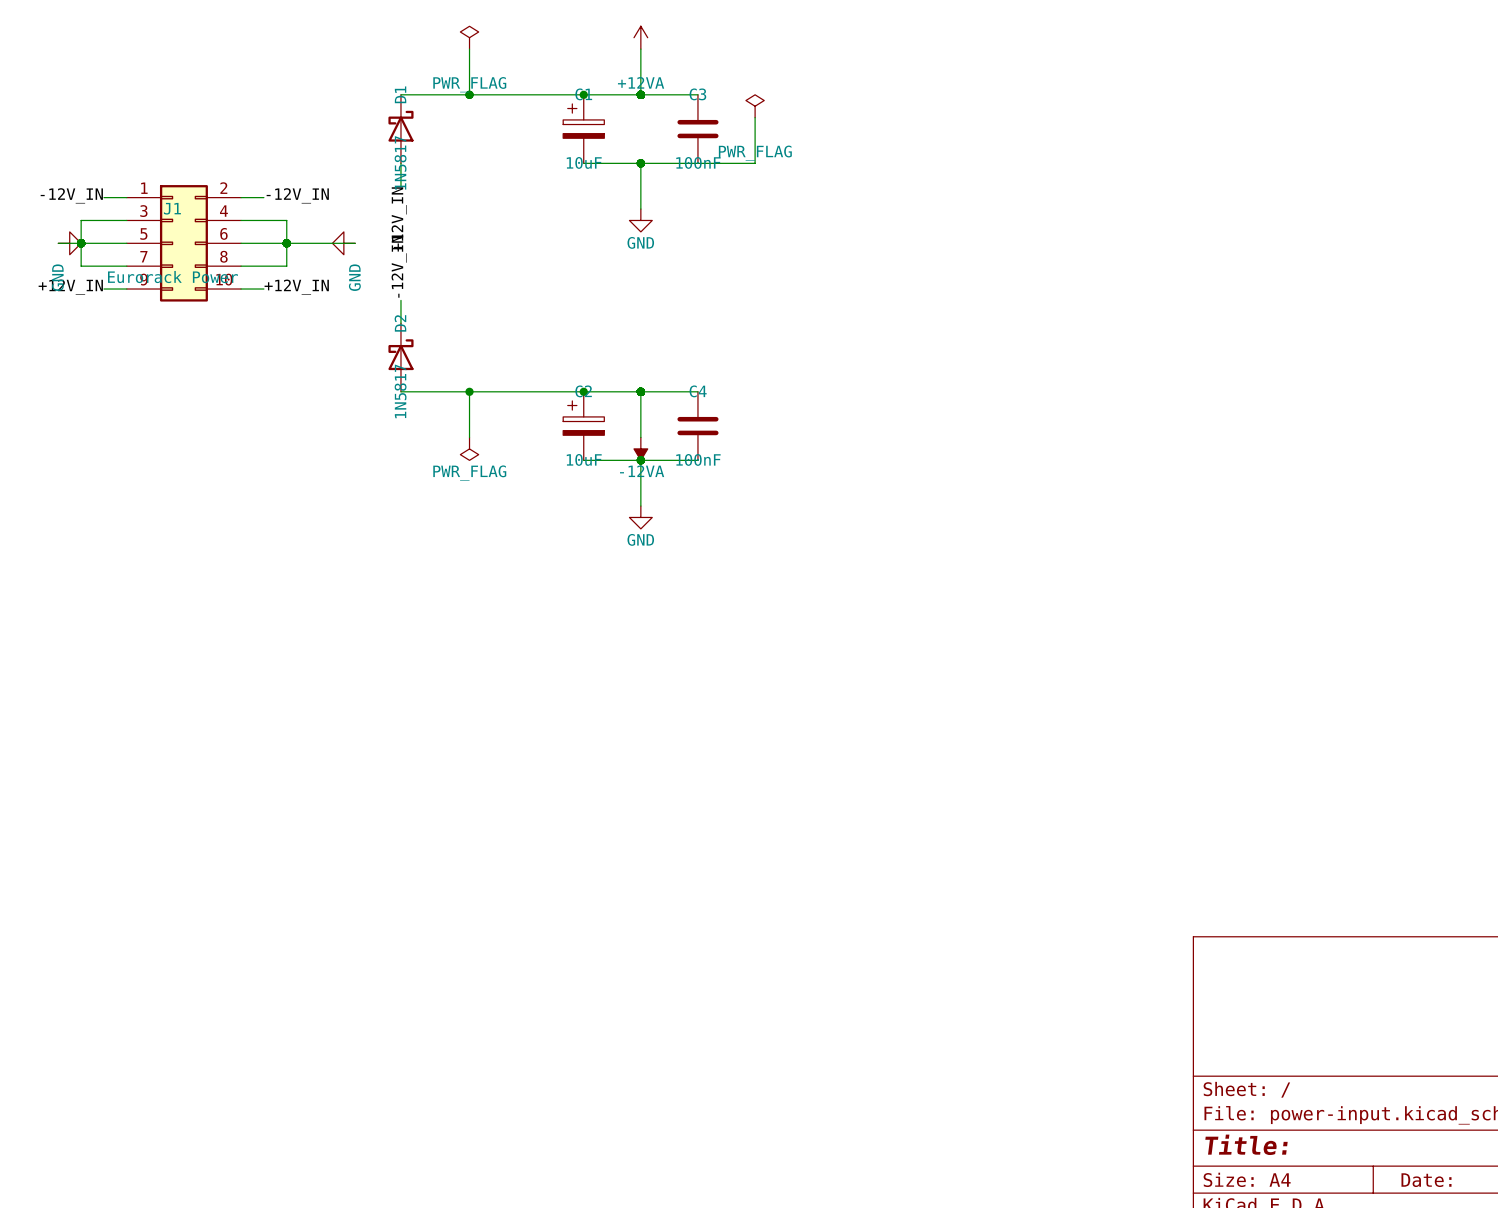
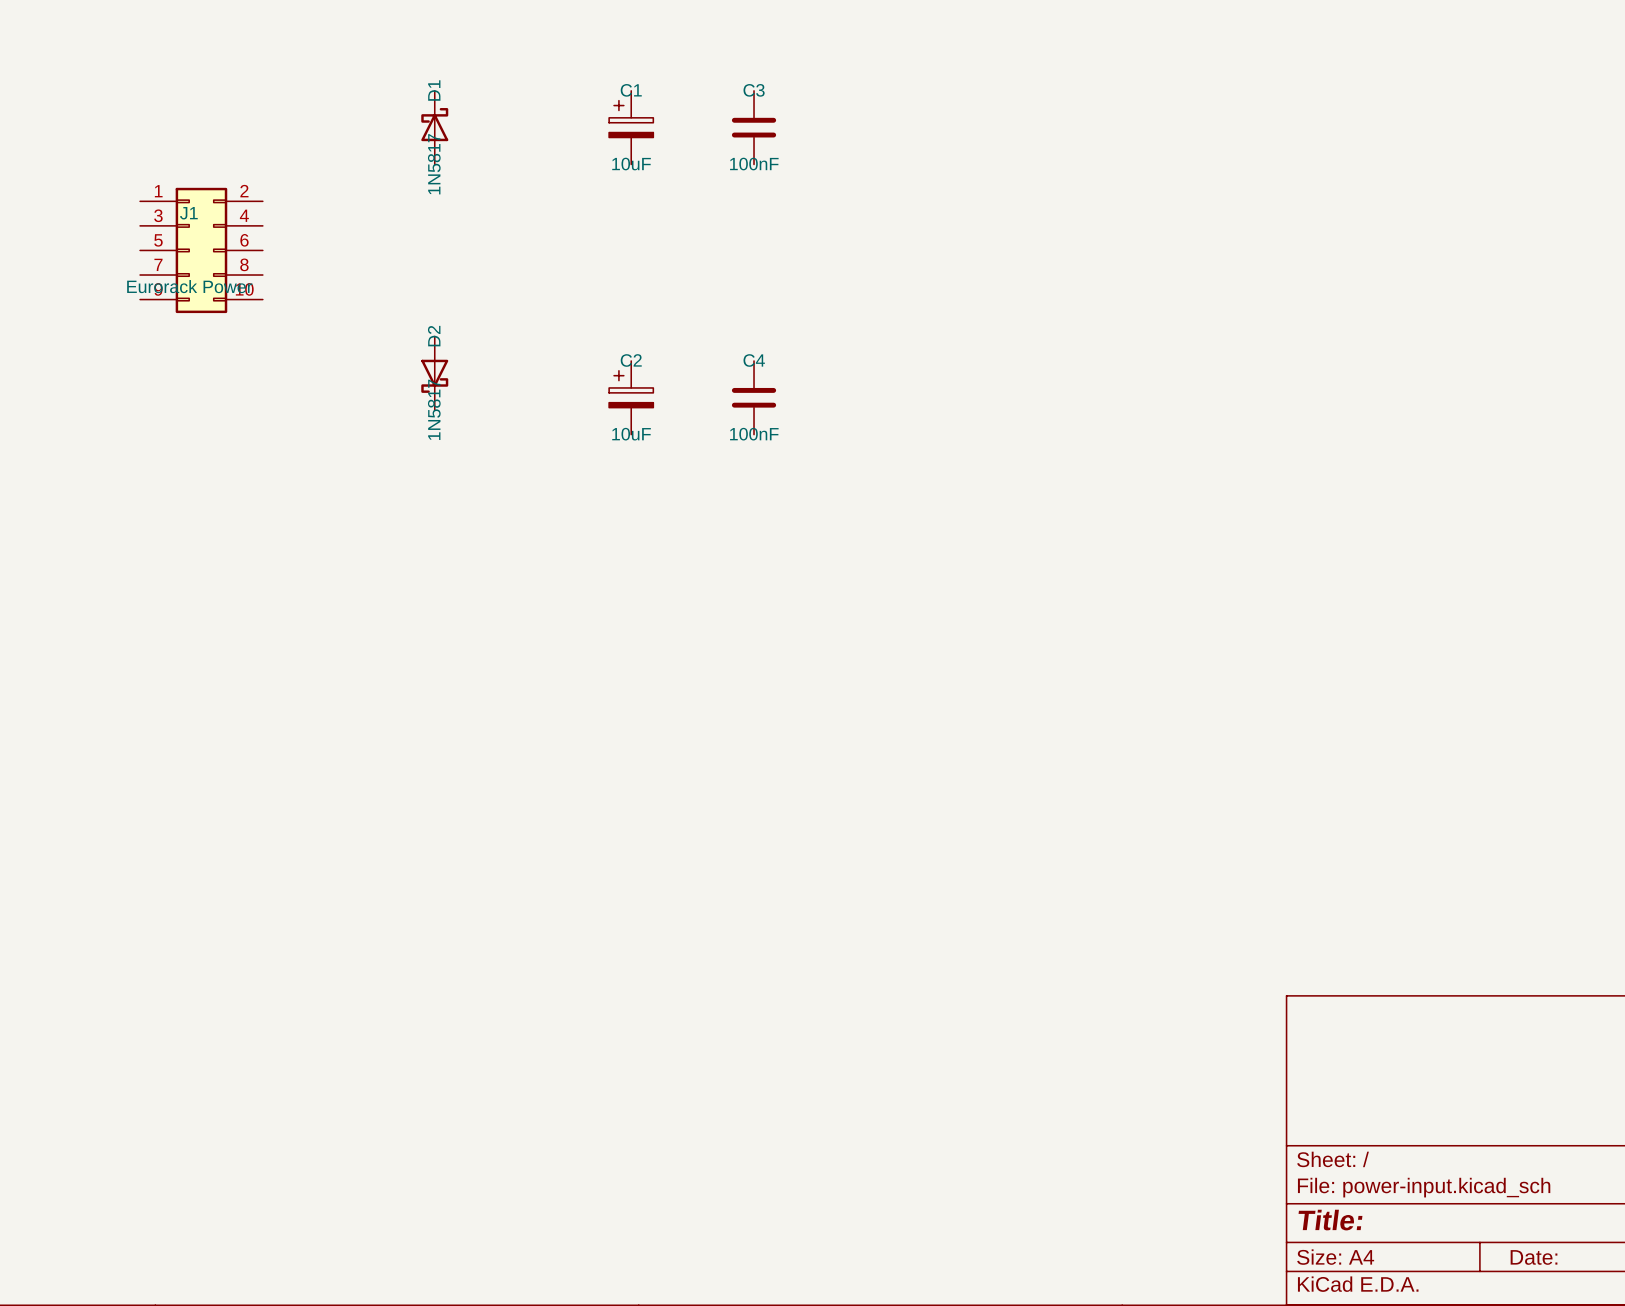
power symbol: PWR_FLAG (469, 37) -> none
power symbol: +12VA (640, 37) -> none
wire: (469, 49) (469, 94) -> none
wire: (640, 49) (640, 94) -> none
wire: (400, 94) (697, 94) -> none
junction: (469, 94) -> none
junction: (583, 94) -> none
junction: (640, 94) -> none
power symbol: PWR_FLAG (755, 106) -> none
wire: (755, 117) (755, 163) (583, 163) -> none
wire: (400, 163) (400, 186) -> none
wire: (640, 163) (640, 209) -> none
junction: (640, 163) -> none
label: -12V_IN (71, 195) -> none
label: -12V_IN (297, 195) -> none
wire: (103, 197) (126, 197) -> none
wire: (241, 197) (263, 197) -> none
label: +12V_IN (399, 219) -> none
wire: (126, 220) (81, 220) (81, 266) (126, 266) -> none
wire: (241, 220) (286, 220) (286, 266) (241, 266) -> none
power symbol: GND (640, 220) -> none
wire: (58, 243) (126, 243) -> none
power symbol: GND (69, 243) -> none
junction: (81, 243) -> none
wire: (241, 243) (355, 243) -> none
junction: (286, 243) -> none
power symbol: GND (343, 243) -> none
label: -12V_IN (399, 266) -> none
label: +12V_IN (70, 287) -> none
label: +12V_IN (296, 287) -> none
wire: (103, 289) (126, 289) -> none
wire: (241, 289) (263, 289) -> none
wire: (400, 300) (400, 323) -> none
D2 rotation: 0° (400, 354) -> 180° (434, 376)
wire: (400, 391) (697, 391) -> none
wire: (469, 391) (469, 437) -> none
junction: (469, 391) -> none
junction: (583, 391) -> none
wire: (640, 391) (640, 437) -> none
junction: (640, 391) -> none
C2 position: (583, 426) -> (631, 397)
C4 position: (697, 426) -> (754, 397)
power symbol: PWR_FLAG (469, 448) -> none
power symbol: -12VA (640, 448) -> none
wire: (583, 460) (697, 460) -> none
wire: (640, 460) (640, 506) -> none
junction: (640, 460) -> none
power symbol: GND (640, 517) -> none

